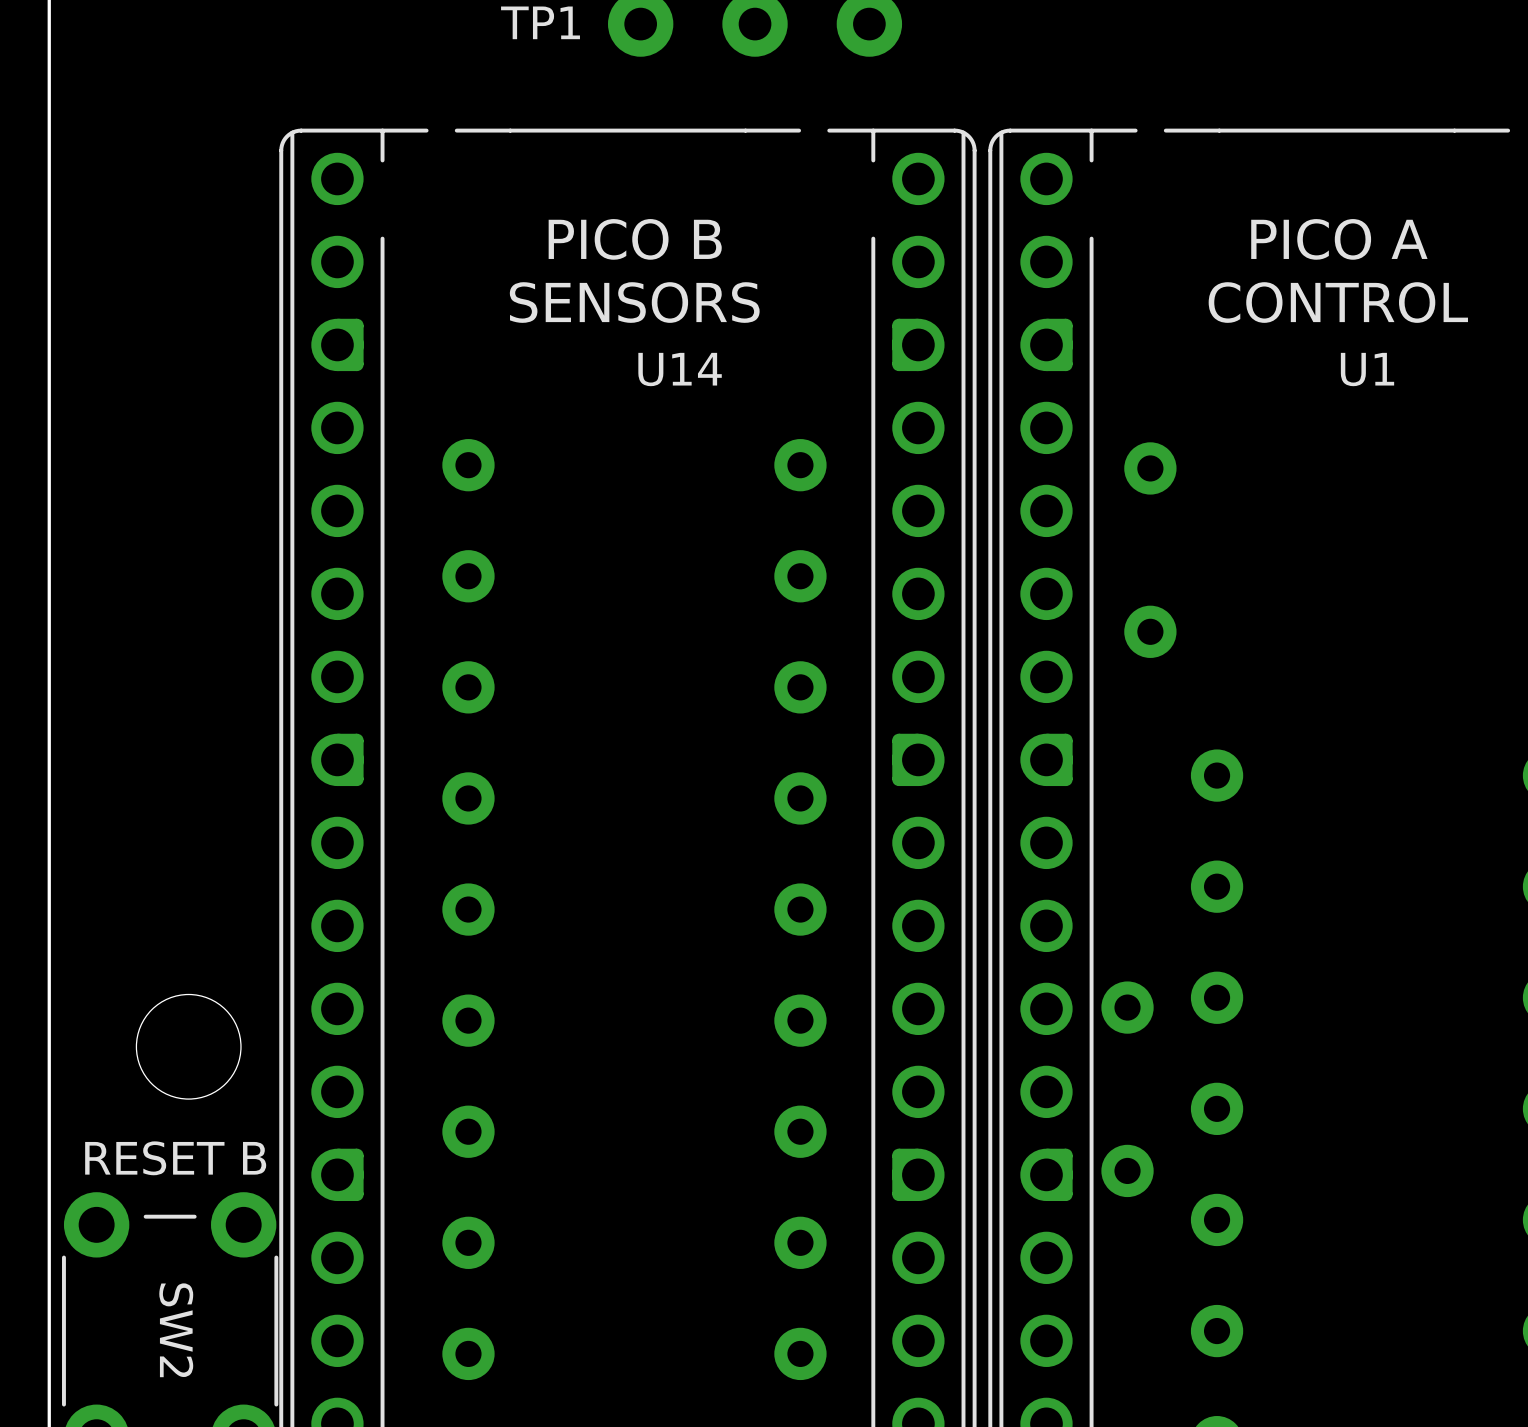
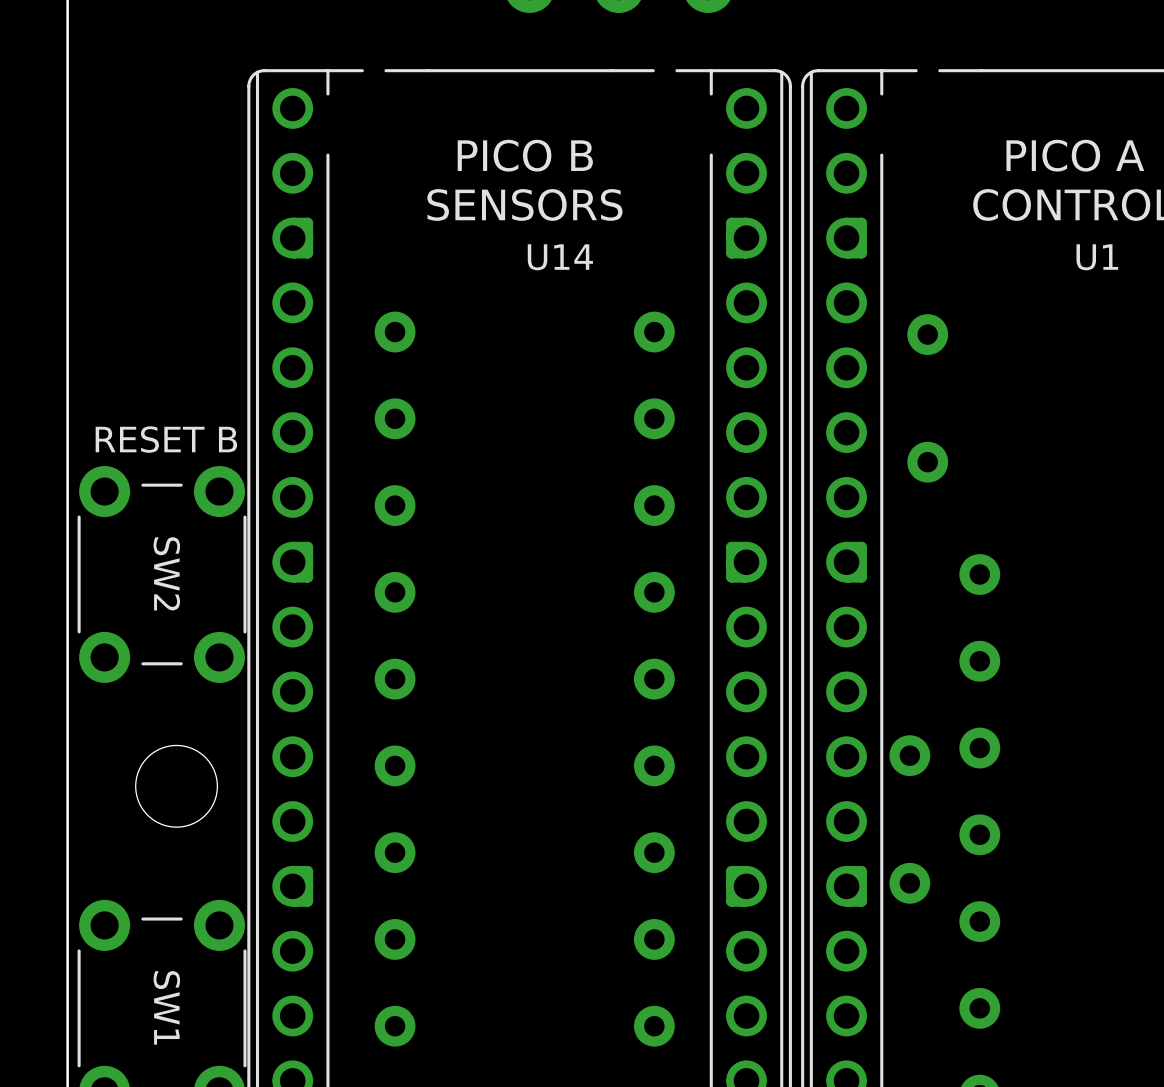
SW2: none -> (162, 574)
text position: RESET B (175, 1158) -> RESET B (166, 439)
SW2 name: SW2 (176, 1330) -> SW1 (166, 1007)

